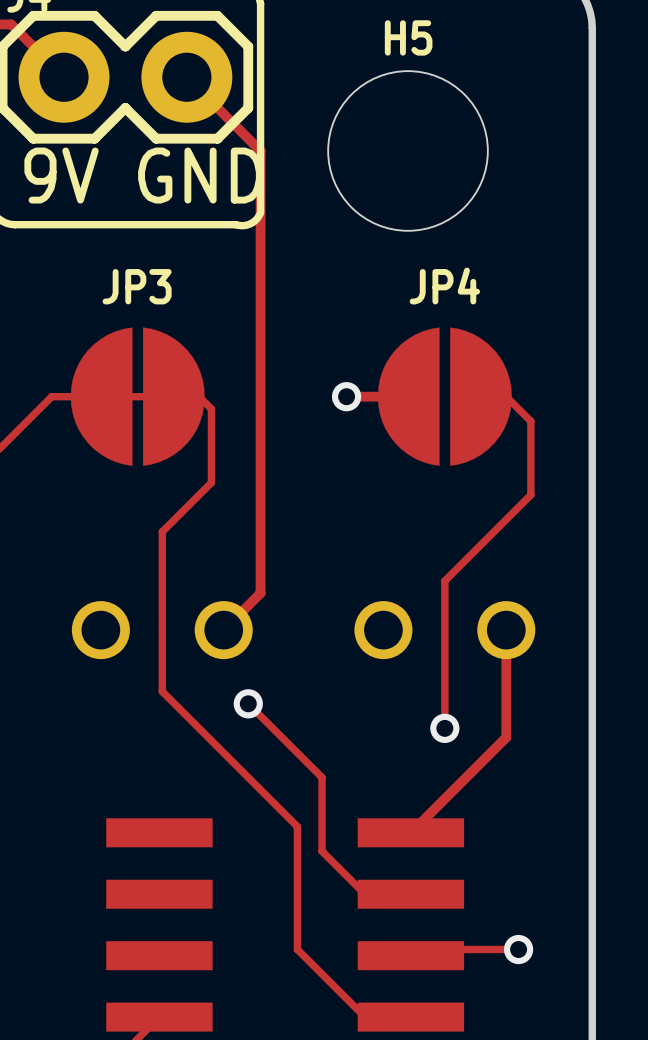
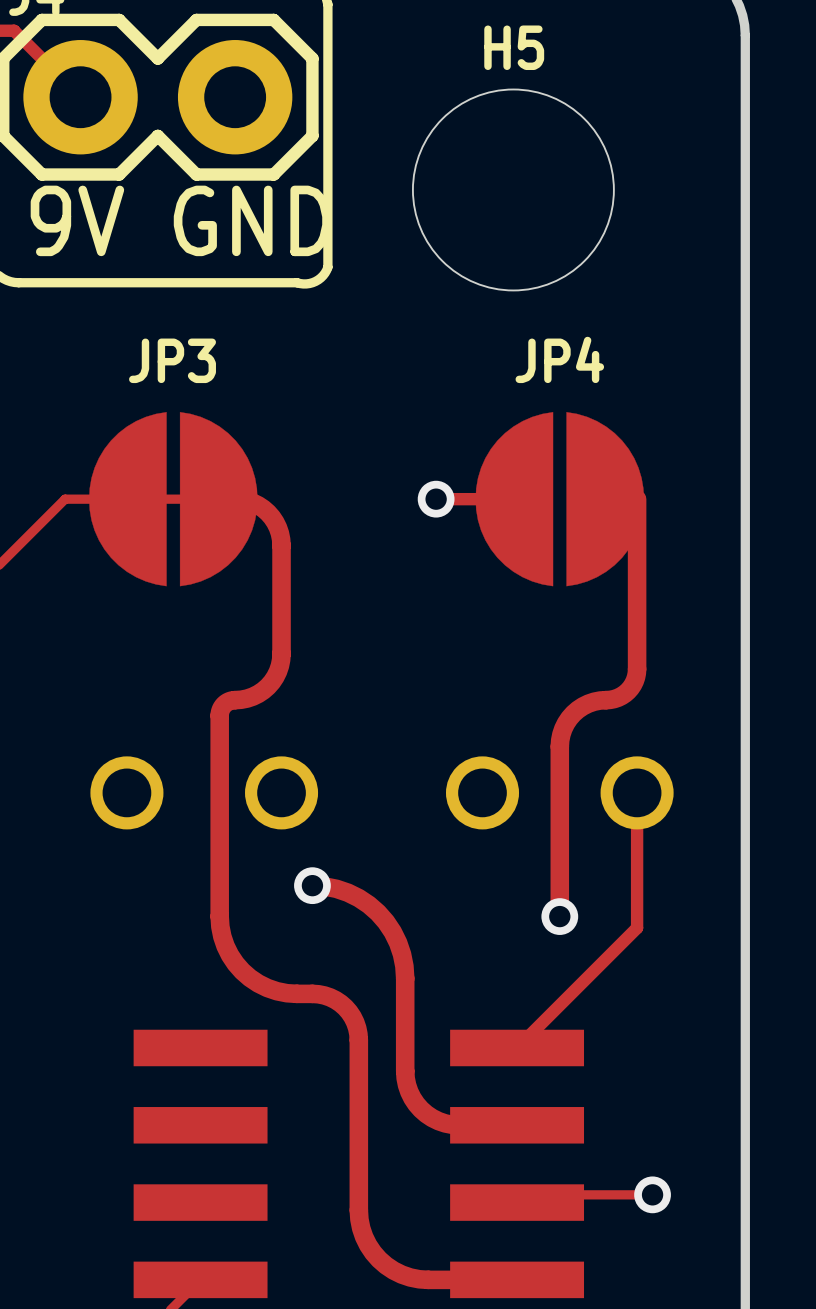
track: (186, 77) (260, 150) (260, 593) (223, 630) -> none
track: (199, 396) (211, 408) (211, 482) (162, 531) (162, 691) (297, 826) (297, 949) (365, 1017) -> (235, 499) (247, 500) (263, 508) (271, 517) (279, 533) (281, 653) (278, 671) (267, 686) (252, 696) (227, 702) (220, 711) (219, 916) (222, 936) (235, 963) (258, 983) (286, 993) (324, 995) (340, 1003) (349, 1012) (355, 1022) (358, 1034) (358, 1210) (364, 1236) (379, 1259) (401, 1274) (419, 1279) (459, 1279)
track: (506, 396) (530, 421) (530, 494) (444, 580) (444, 593) -> (637, 499) (636, 677) (630, 688) (621, 696) (588, 703) (573, 713) (563, 728) (559, 746)
track width: thin (444, 593) (444, 728) -> thick (559, 746) (559, 916)
track: (248, 703) (322, 777) -> (312, 885) (336, 888) (347, 892) (358, 898) (378, 912) (392, 932) (398, 942) (402, 954) (405, 978)
track width: thin (322, 777) (322, 851) -> thick (405, 978) (405, 1071)
track: (322, 851) (371, 900) (377, 894) -> (405, 1071) (407, 1085) (416, 1104) (426, 1114) (438, 1121) (459, 1125) (517, 1125)

